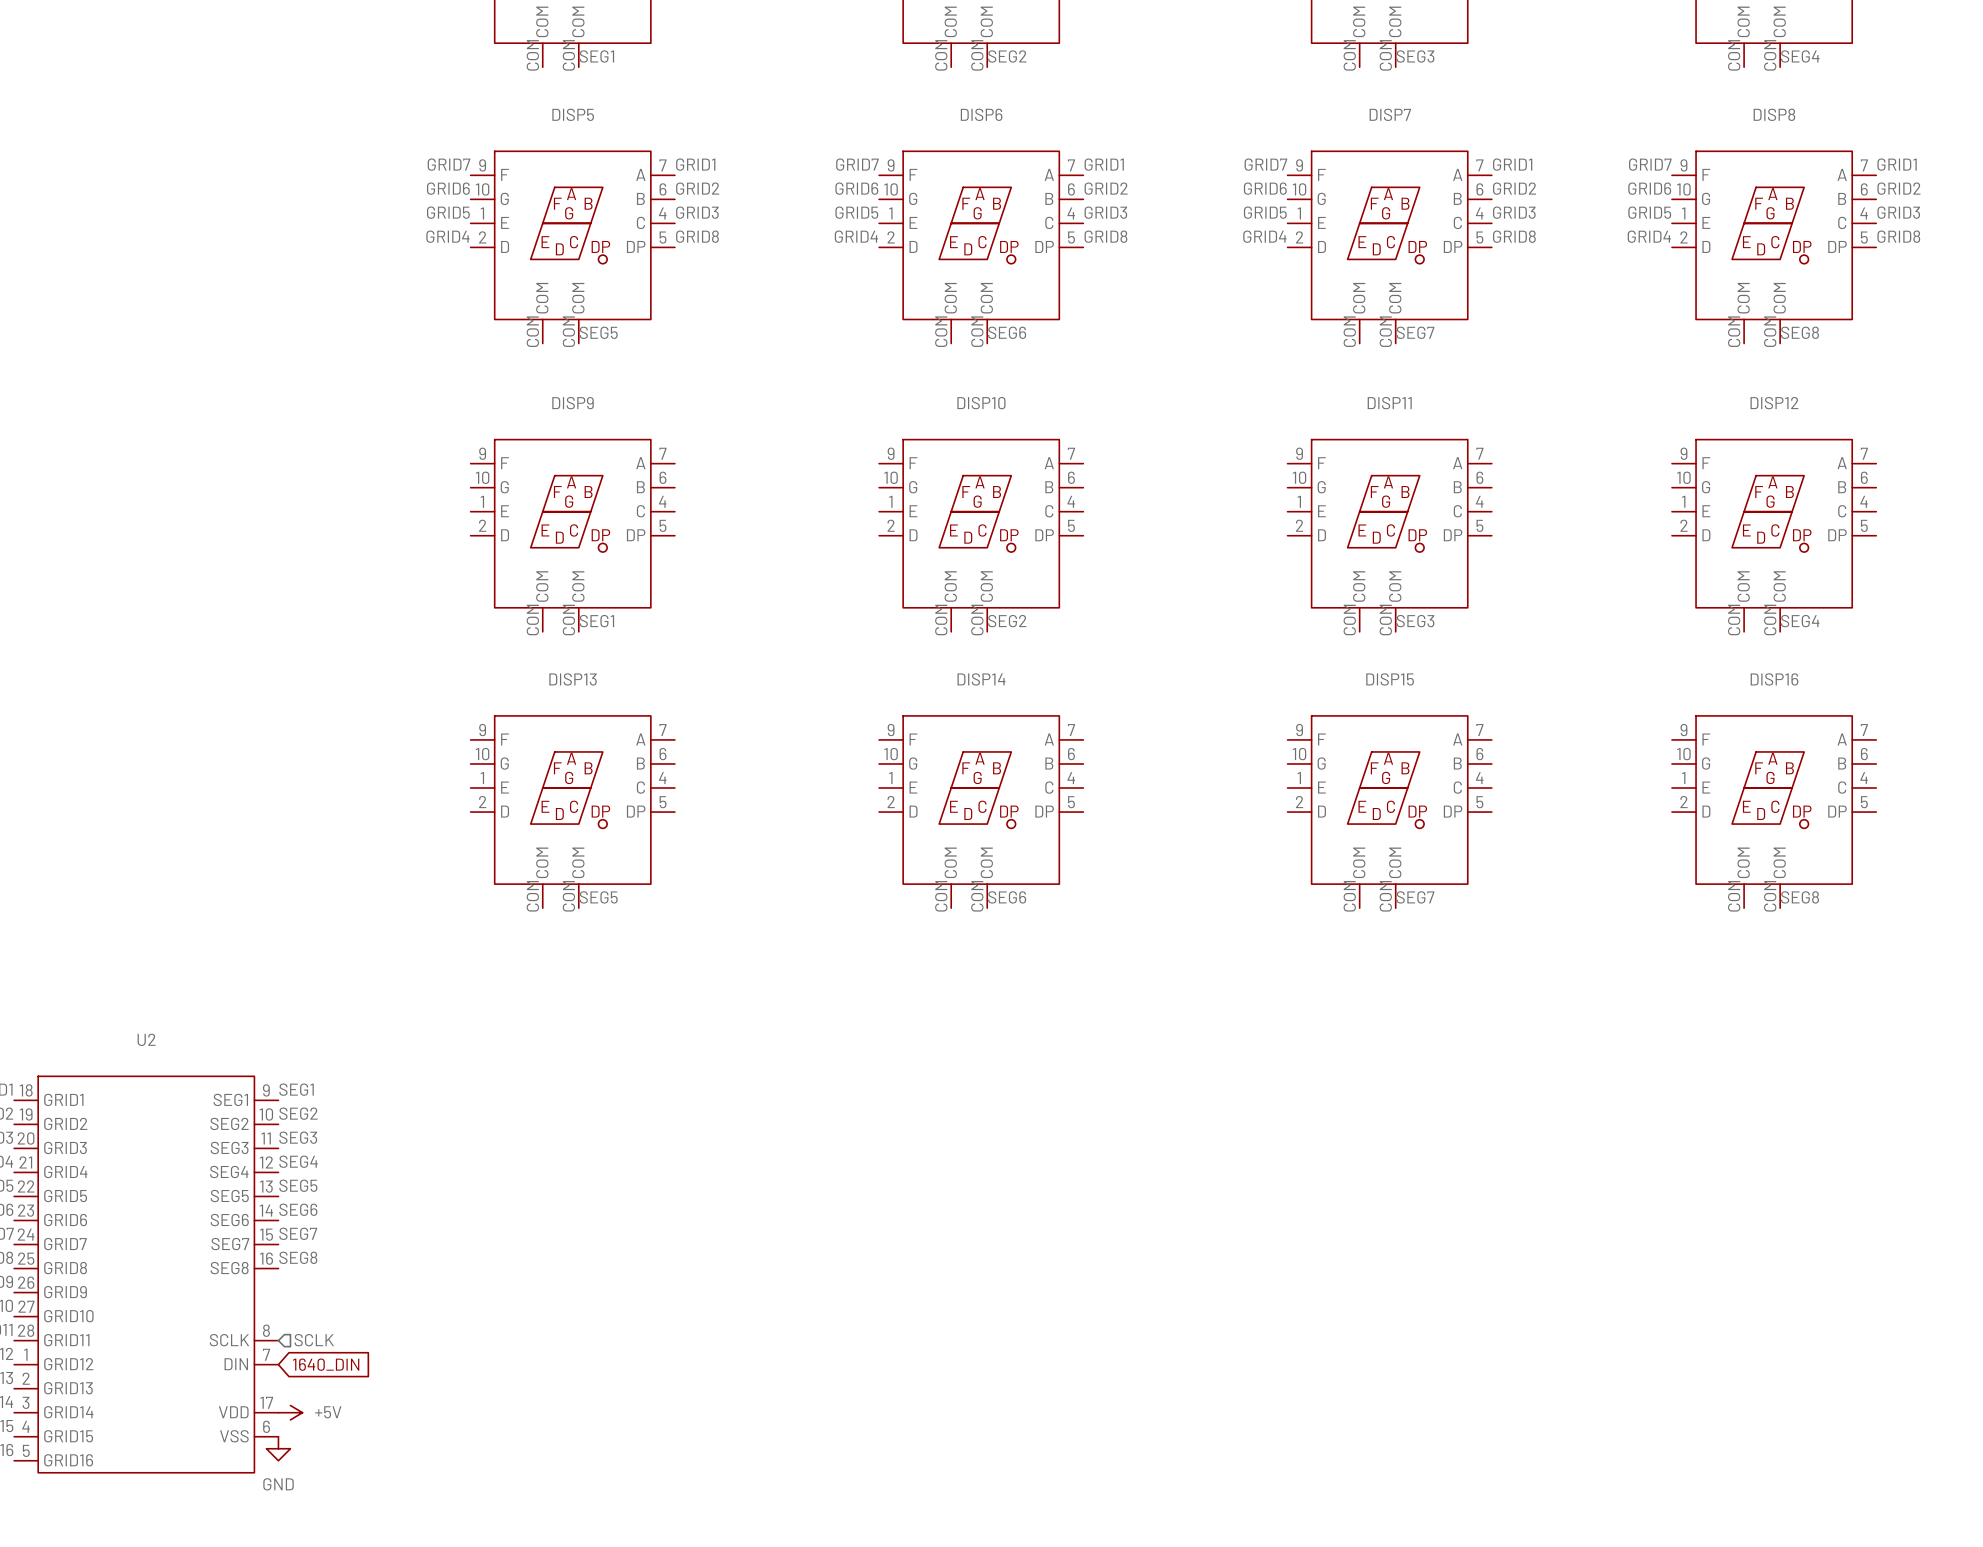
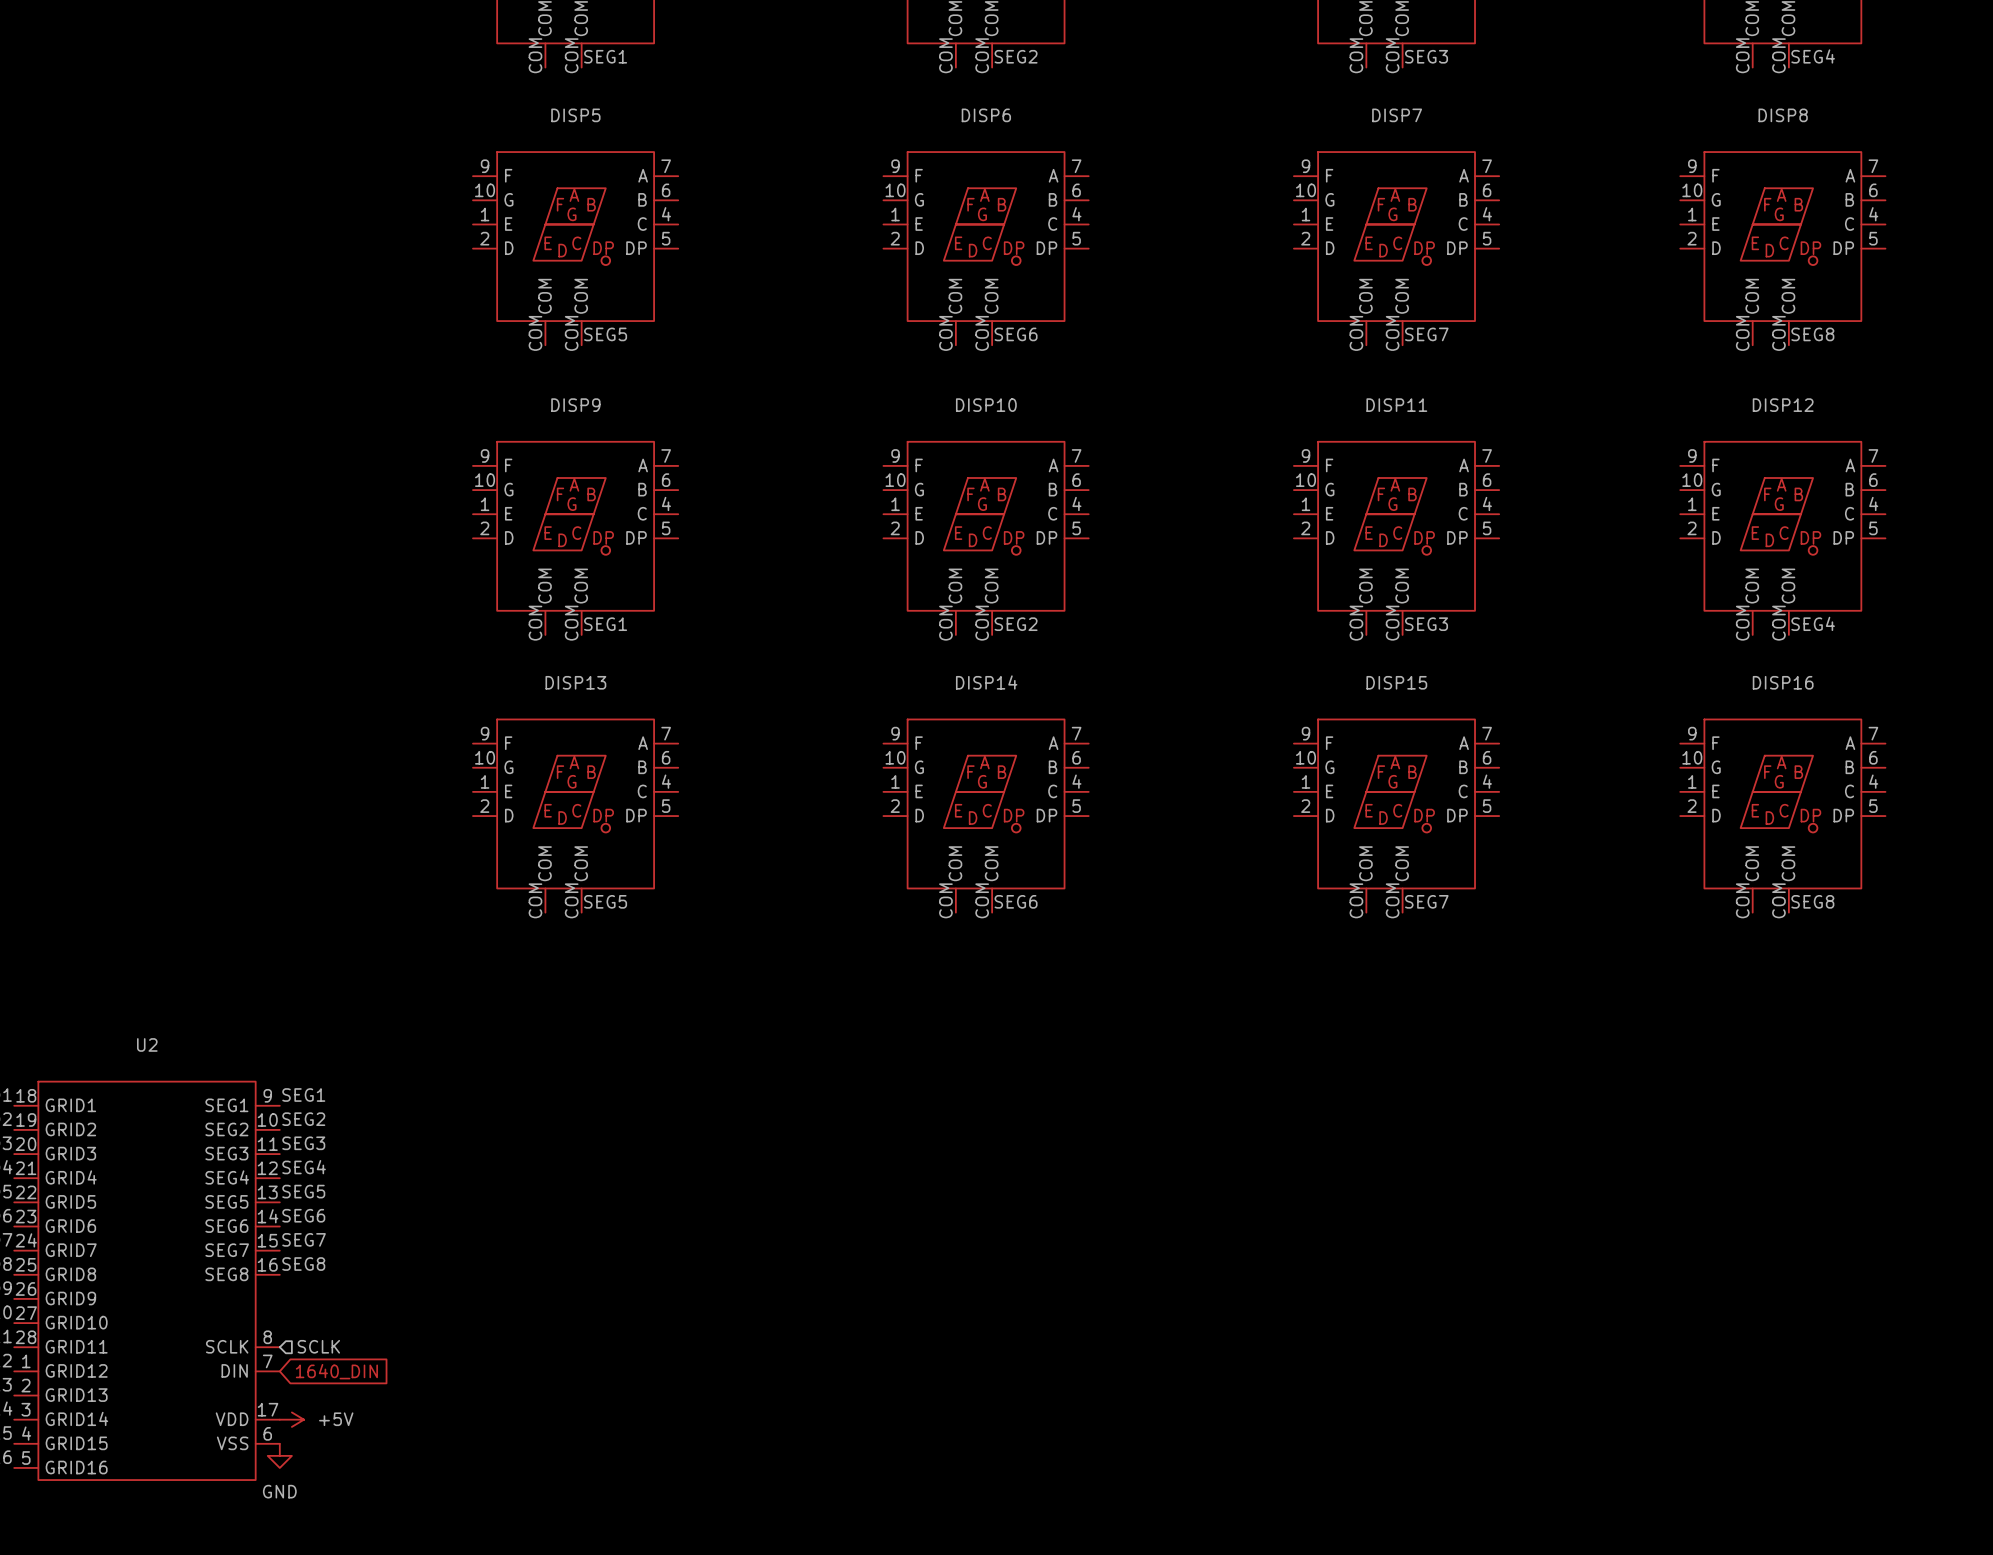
label: GRID7 (448, 164) -> none
label: GRID1 (695, 164) -> none
label: GRID7 (857, 164) -> none
label: GRID1 (1104, 164) -> none
label: GRID7 (1265, 164) -> none
label: GRID1 (1512, 164) -> none
label: GRID7 (1650, 164) -> none
label: GRID1 (1897, 164) -> none
label: GRID6 (448, 188) -> none
label: GRID2 (697, 188) -> none
label: GRID6 (856, 188) -> none
label: GRID2 (1106, 188) -> none
label: GRID6 (1265, 188) -> none
label: GRID2 (1514, 188) -> none
label: GRID6 (1649, 188) -> none
label: GRID2 (1898, 188) -> none
label: GRID5 (448, 212) -> none
label: GRID3 (697, 212) -> none
label: GRID5 (856, 212) -> none
label: GRID3 (1105, 212) -> none
label: GRID5 (1265, 212) -> none
label: GRID3 (1514, 212) -> none
label: GRID5 (1649, 212) -> none
label: GRID3 (1898, 212) -> none
label: GRID4 (447, 236) -> none
label: GRID8 (697, 236) -> none
label: GRID4 (856, 236) -> none
label: GRID8 (1105, 236) -> none
label: GRID4 (1264, 236) -> none
label: GRID8 (1514, 236) -> none
label: GRID4 (1649, 236) -> none
label: GRID8 (1898, 236) -> none

